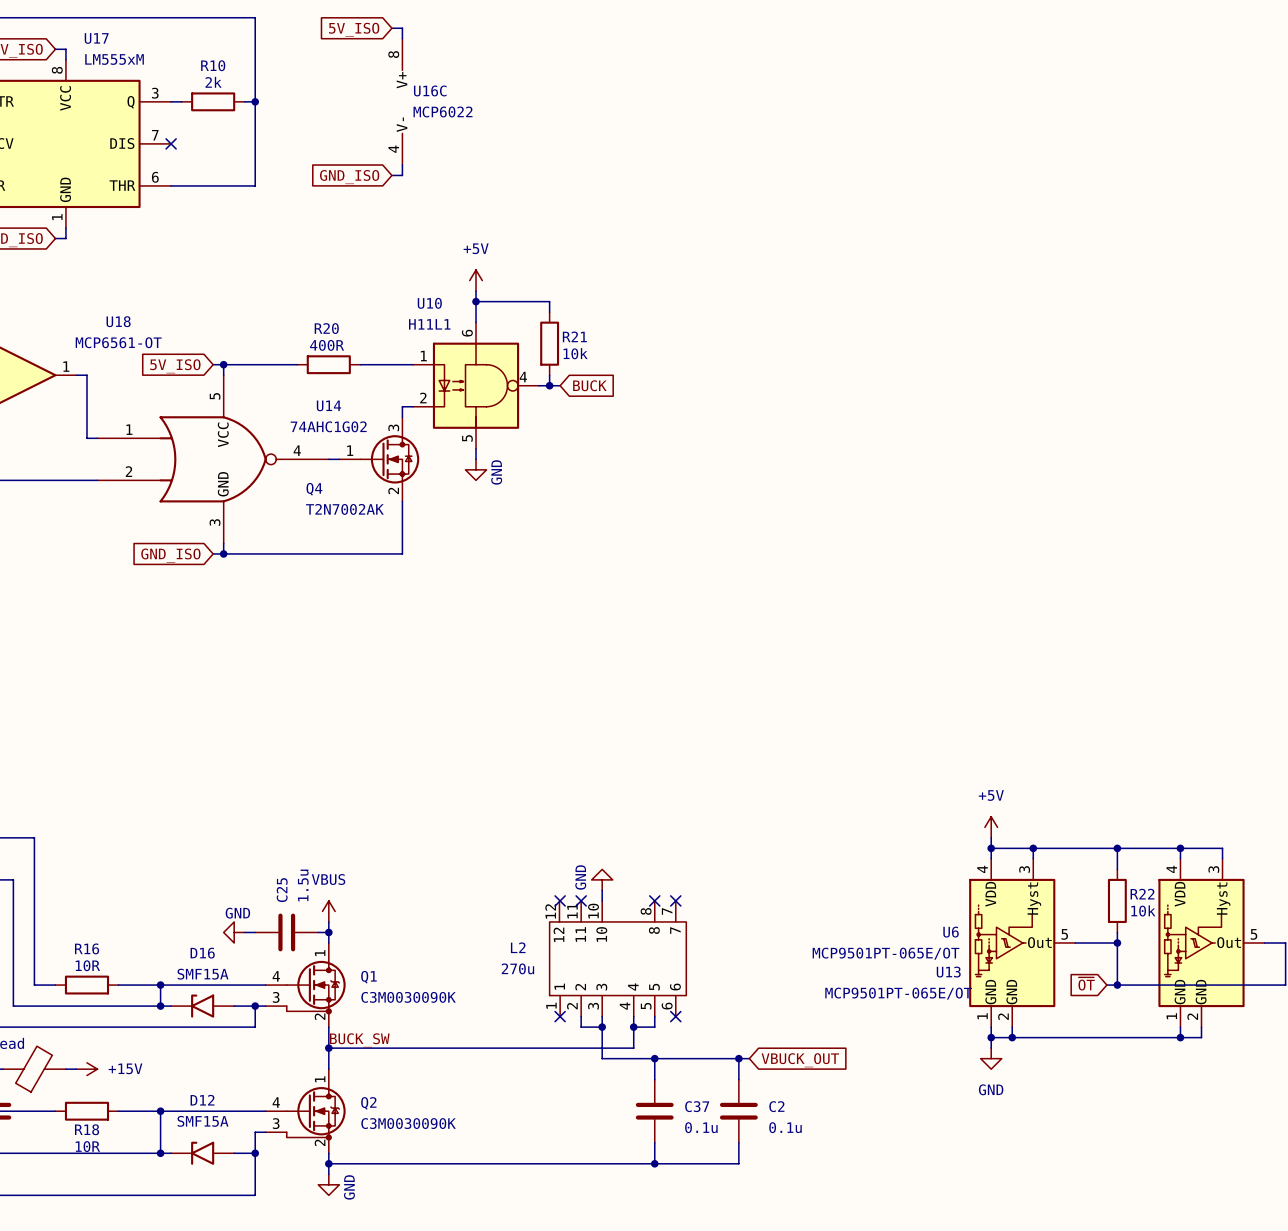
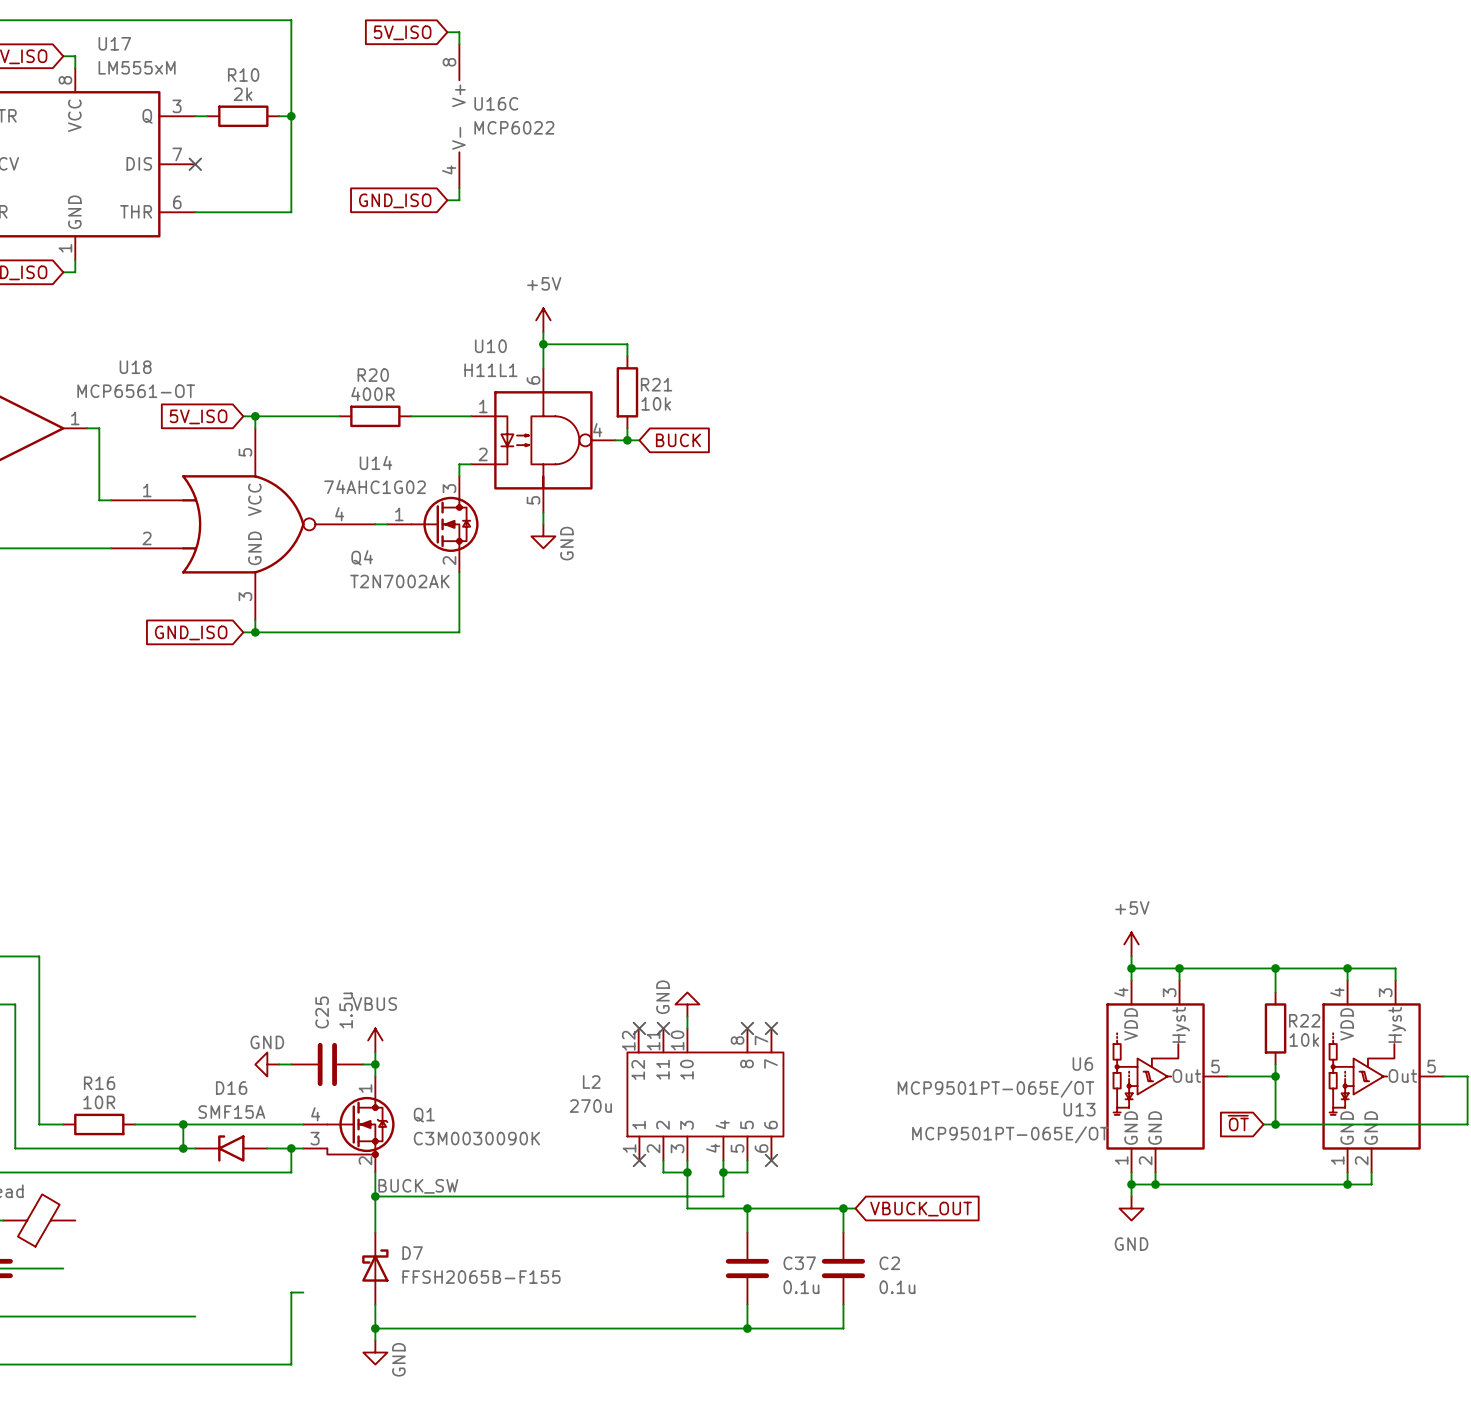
wire: (65, 1069) (76, 1069) -> none
power symbol: +15V (86, 1069) -> none
R18: 10R (86, 1111) -> none
wire: (118, 1111) (265, 1111) -> none
wire: (160, 1111) (160, 1153) -> none
junction: (160, 1111) -> none
Q2: C3M0030090K (305, 1111) -> none
D7: none -> FFSH2065B-F155 (375, 1268)
junction: (160, 1153) -> none
D12: SMF15A (202, 1153) -> none
wire: (234, 1153) (255, 1153) -> none
junction: (255, 1153) -> none

